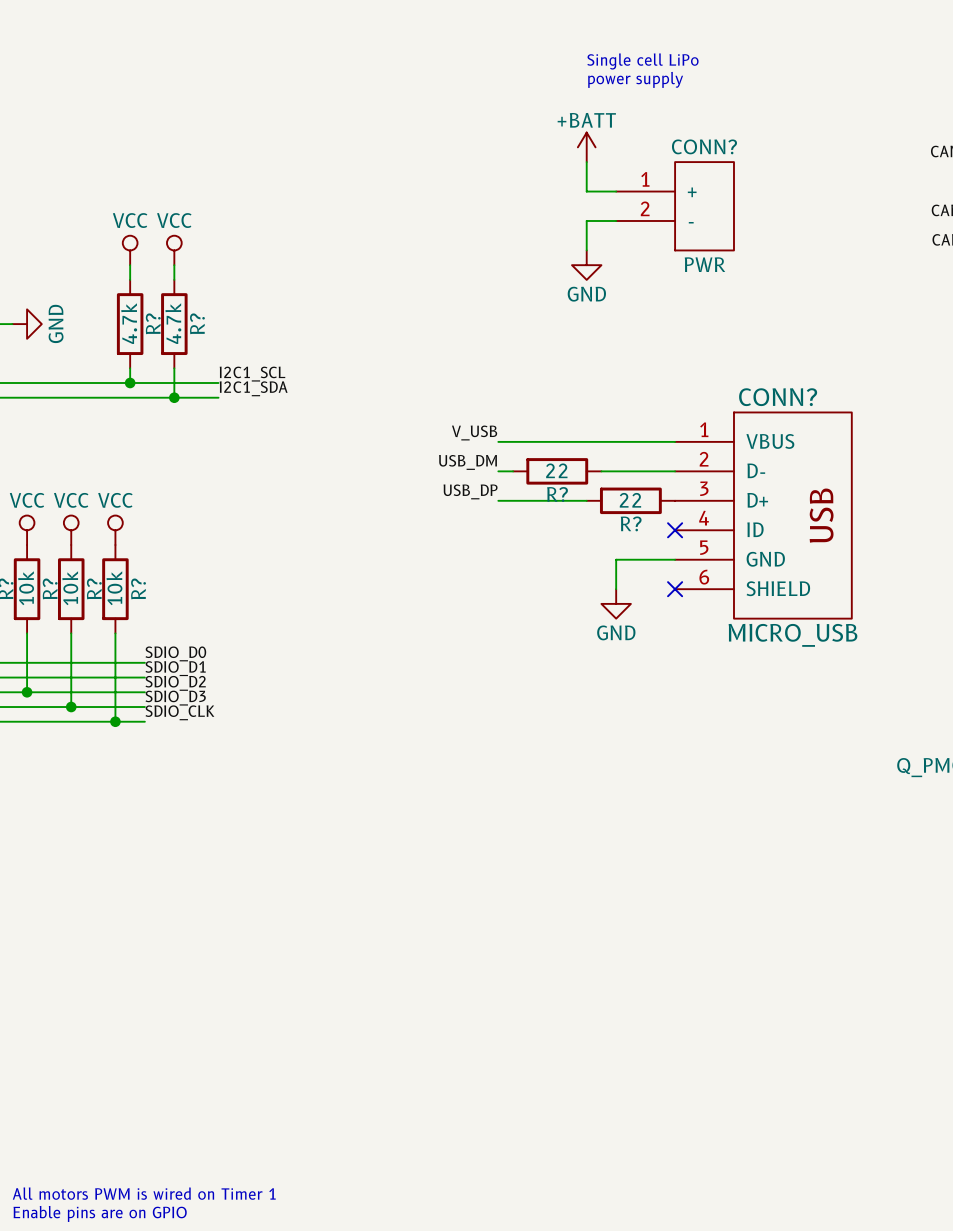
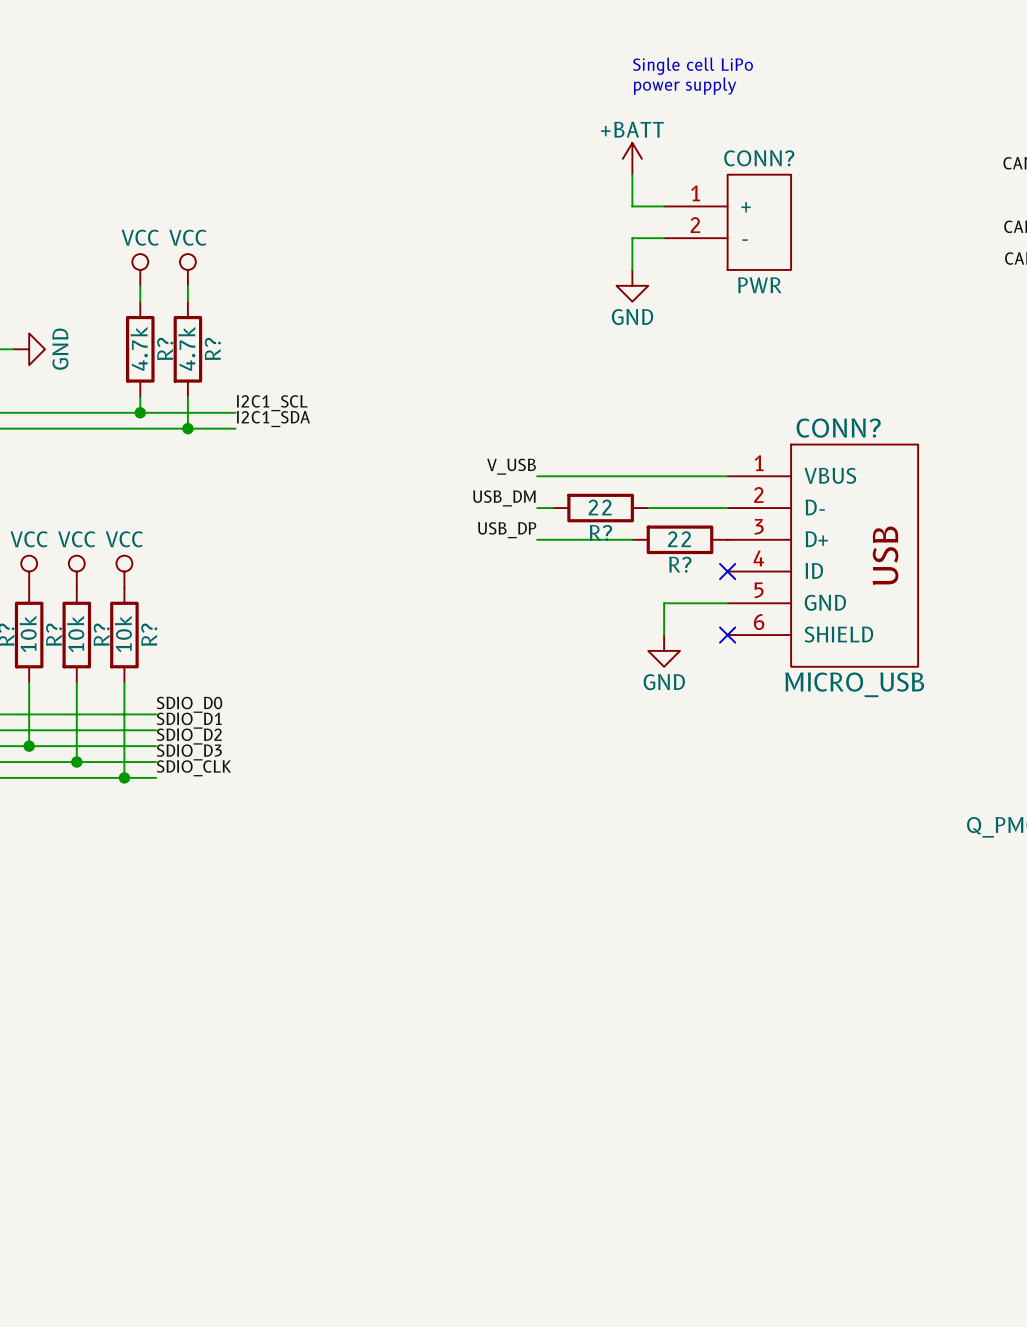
text: All motors PWM is wired on Timer 1 (144, 1193) -> none
text: Enable pins are on GPIO (100, 1213) -> none

